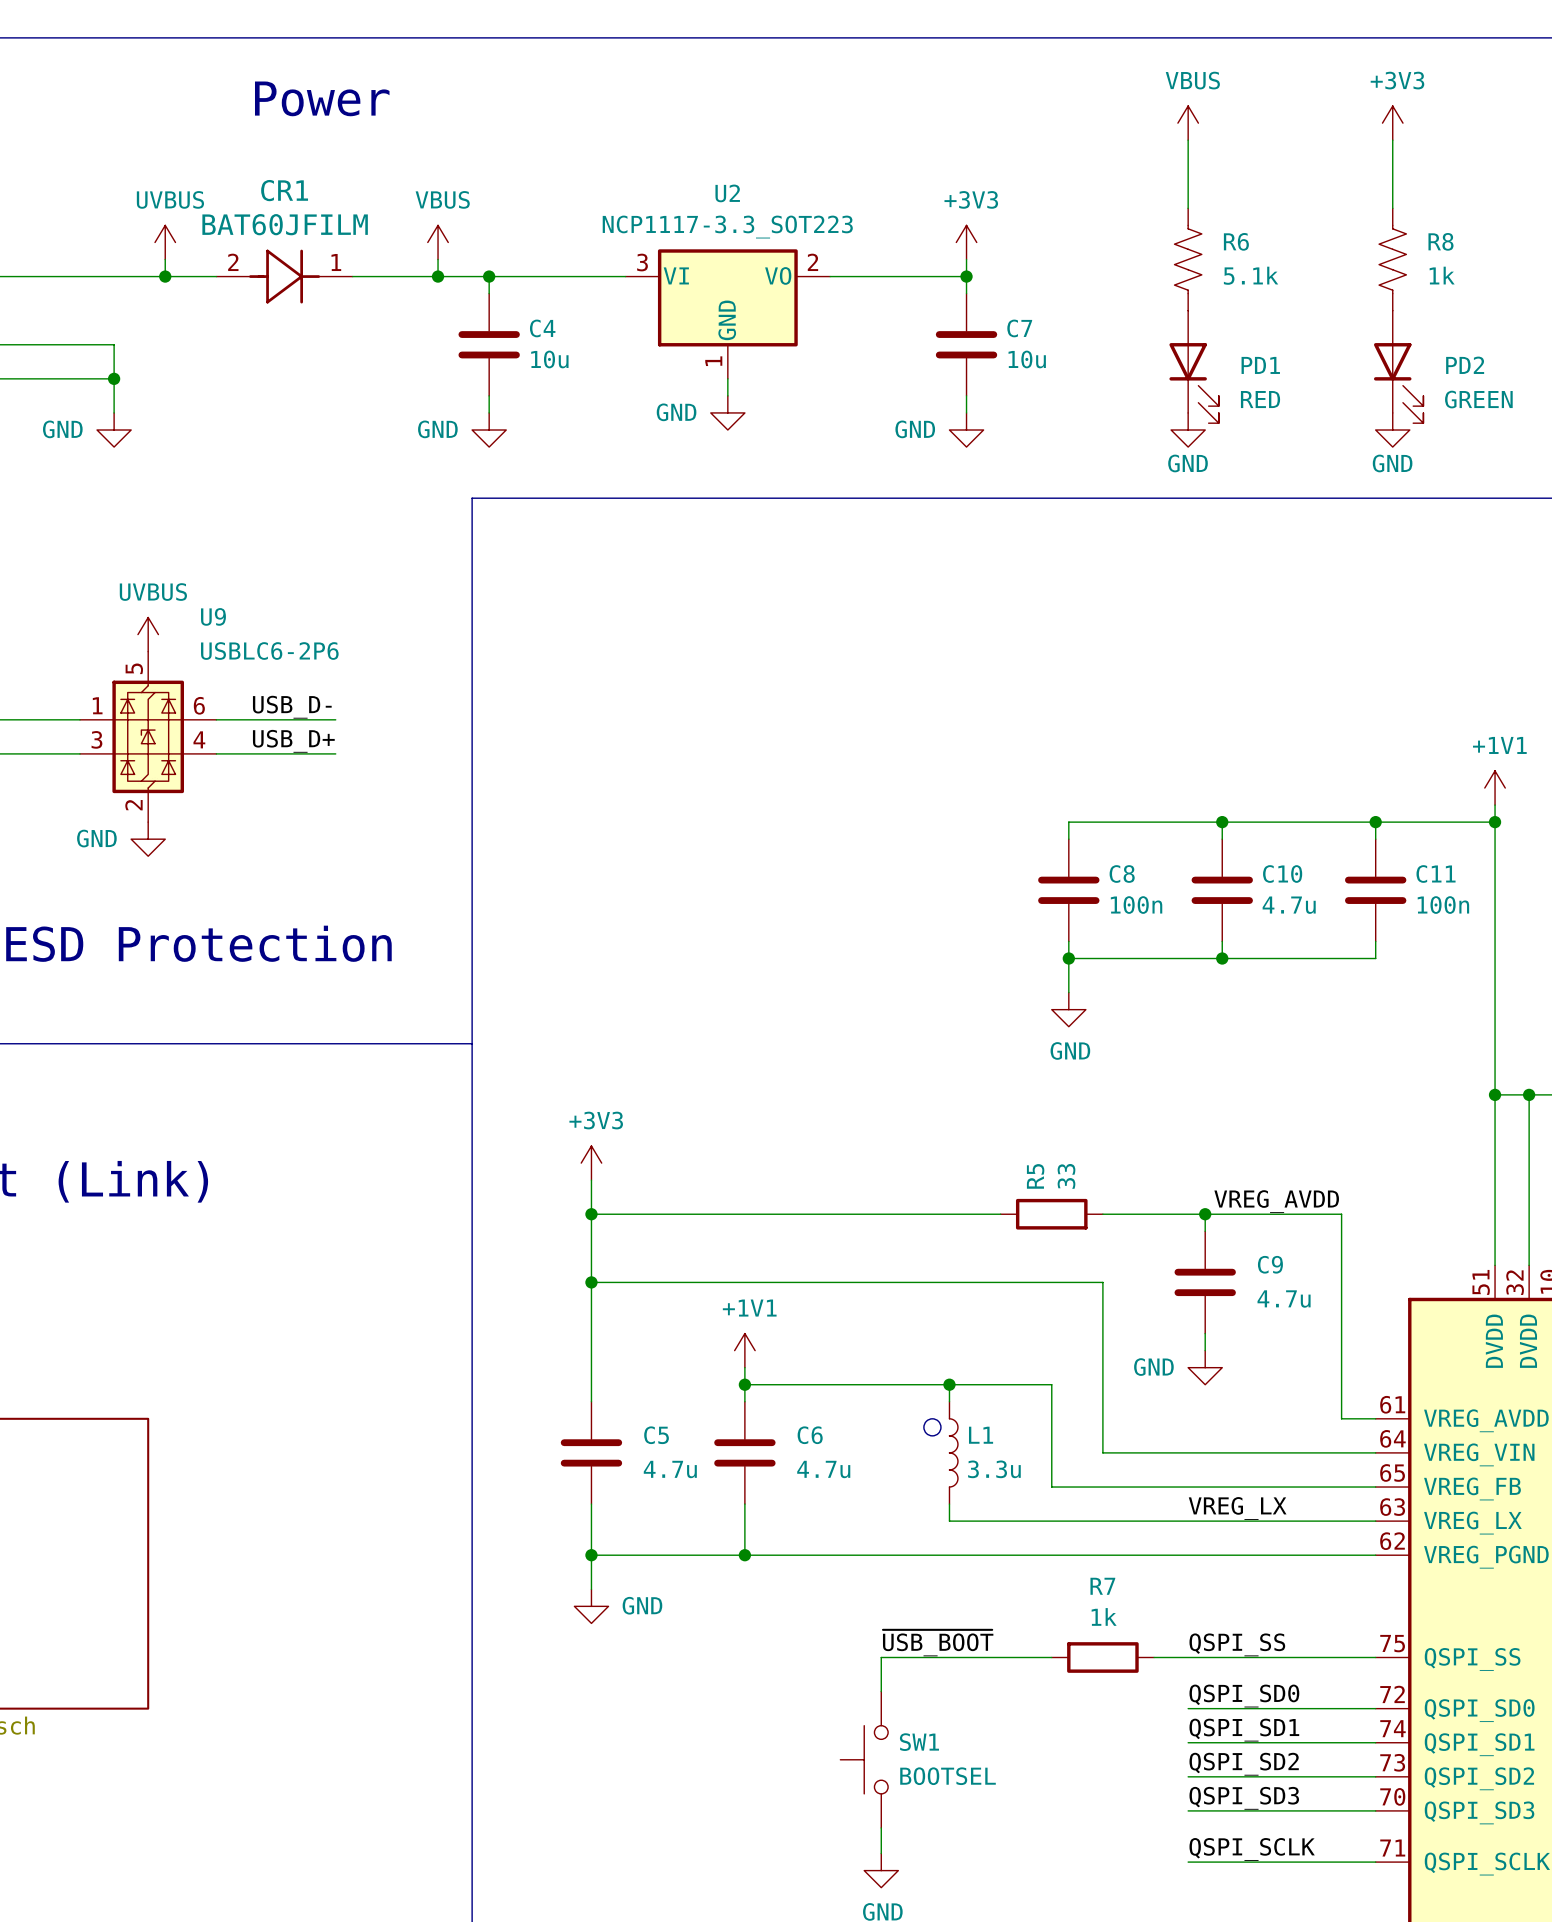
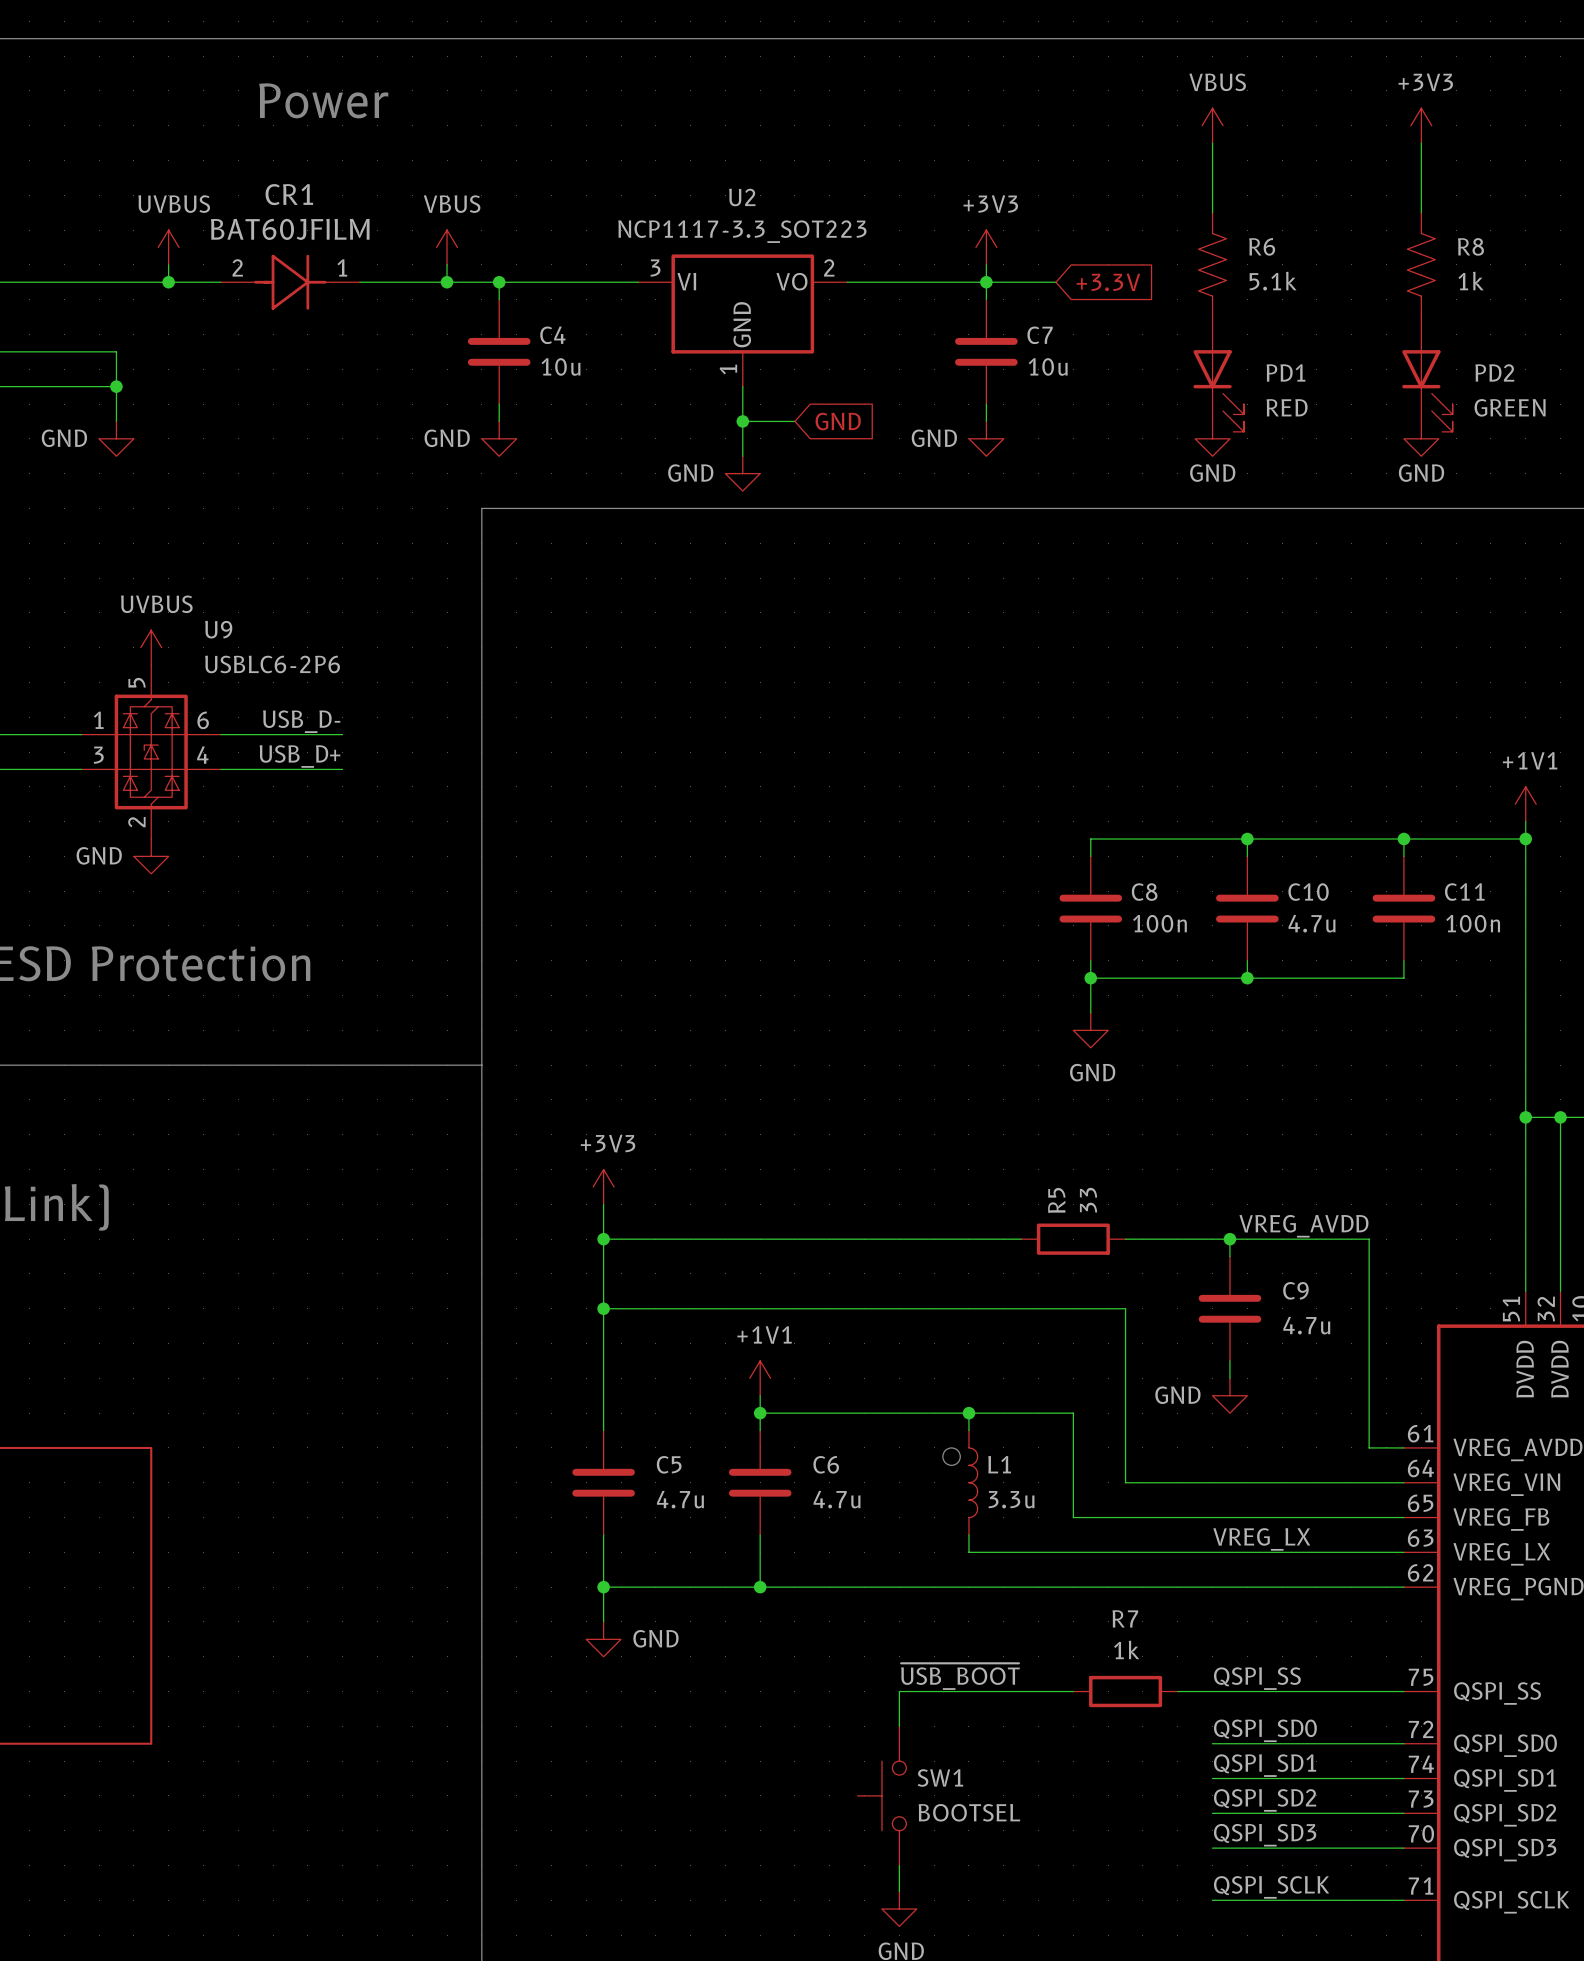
wire: none -> (986, 282) (1055, 282)
global label: none -> +3.3V (1108, 282)
wire: none -> (742, 404) (742, 456)
wire: none -> (742, 421) (794, 421)
power symbol position: GND (727, 412) -> GND (742, 473)
junction: none -> (742, 421)
global label: none -> GND (838, 421)

